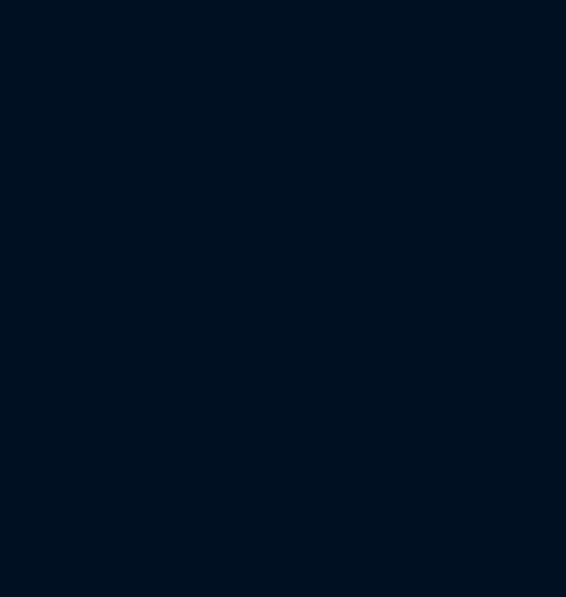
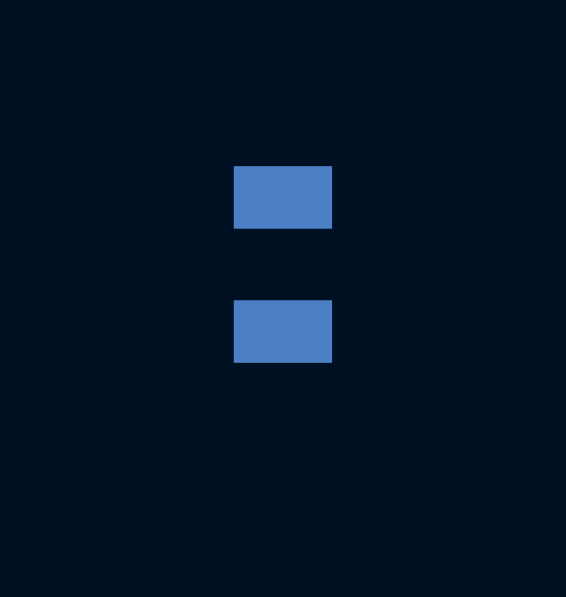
part: none -> (282, 264)

